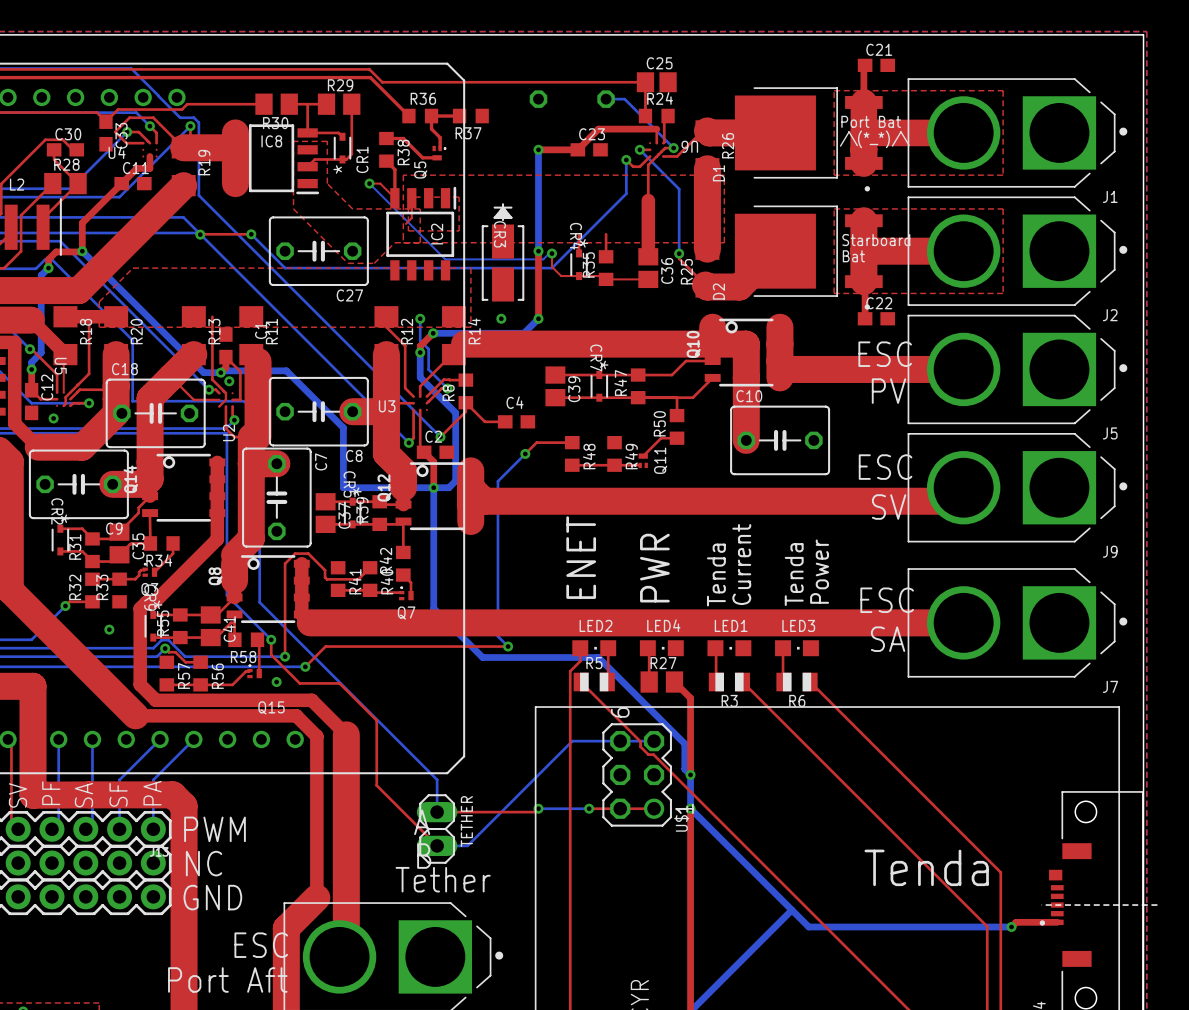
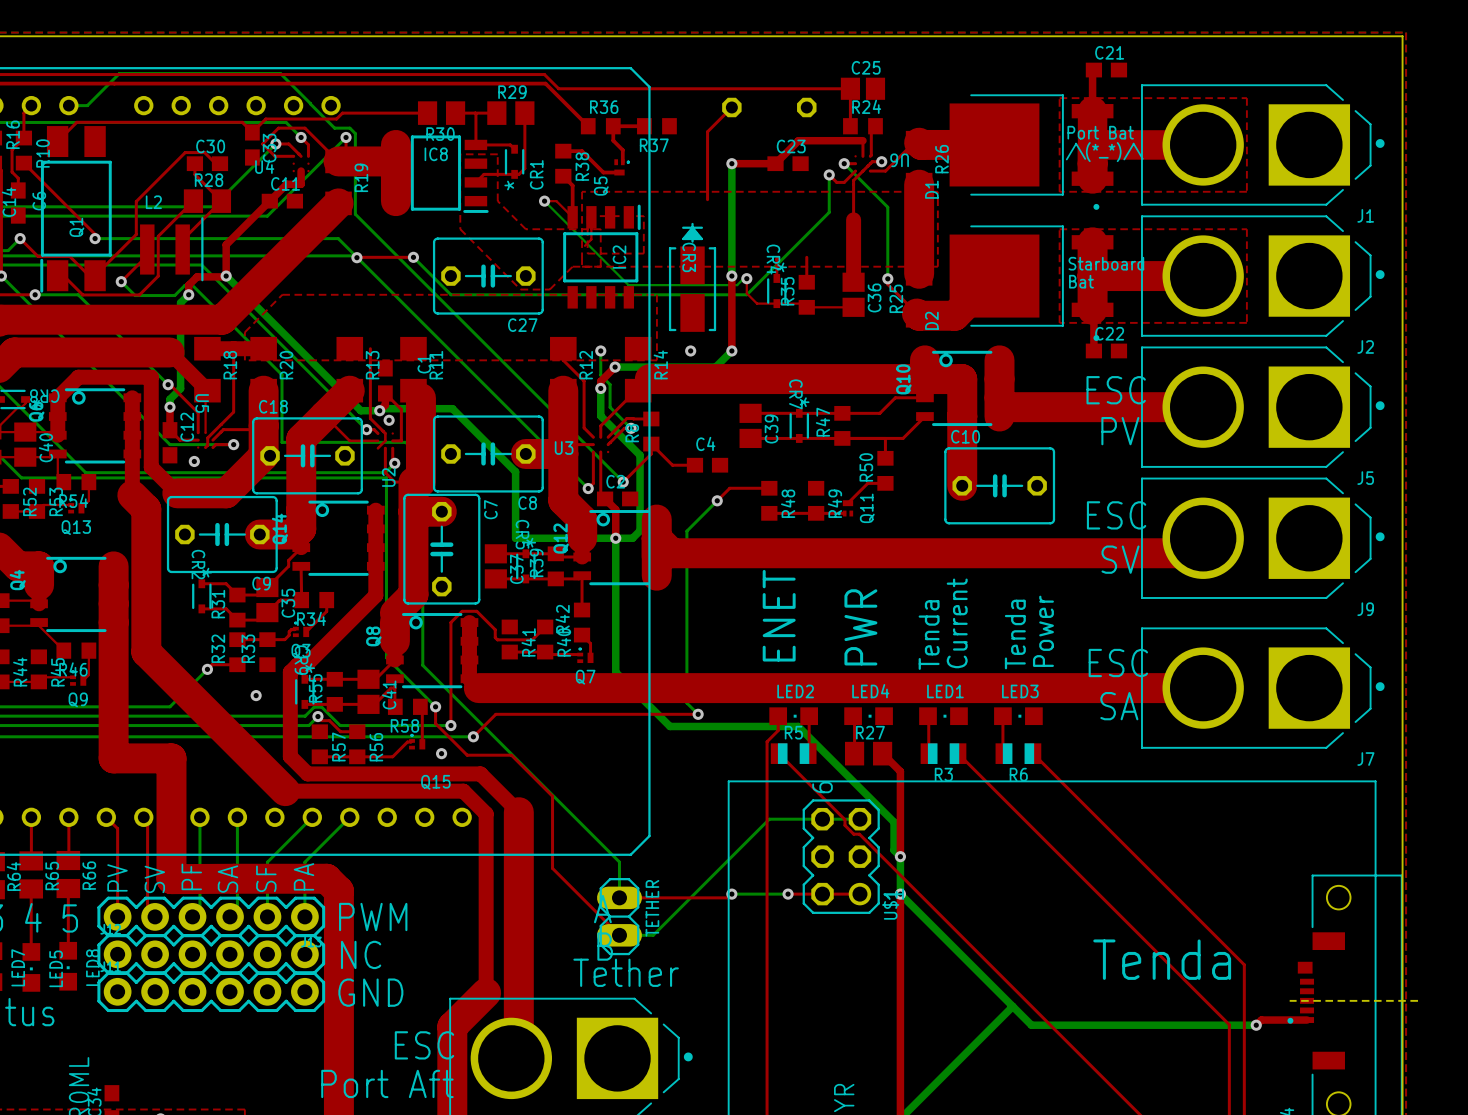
top track: none -> (731, 107) (707, 131) (707, 199)
bottom track: (606, 99) (624, 99) (673, 148) -> none

